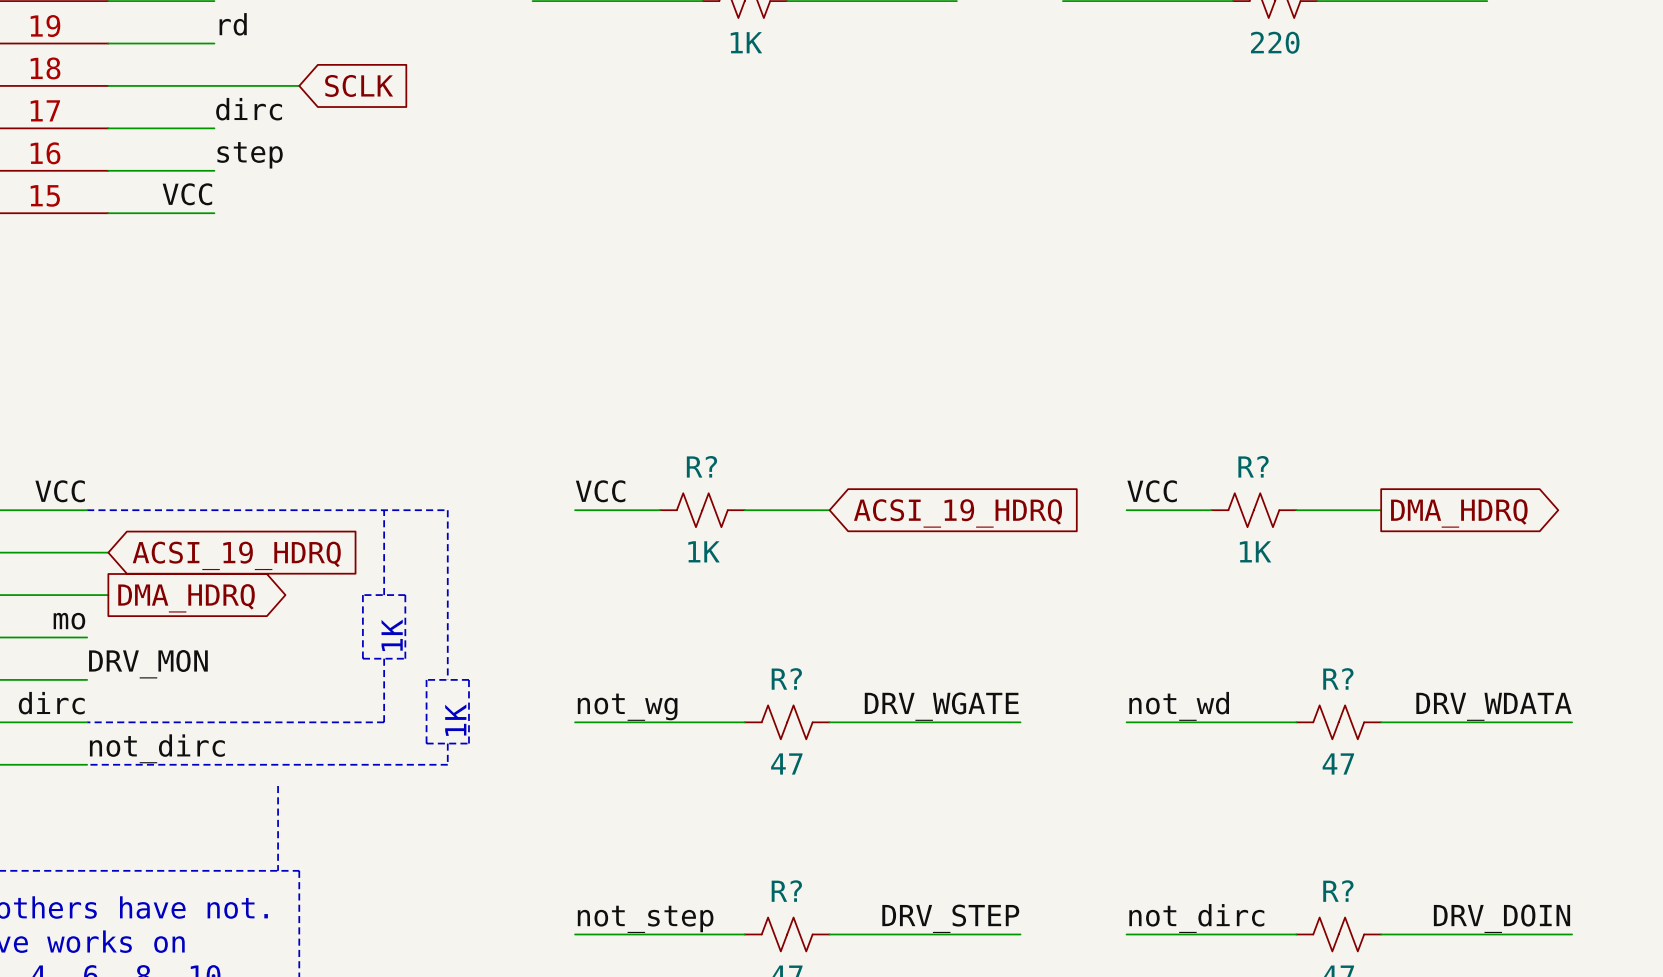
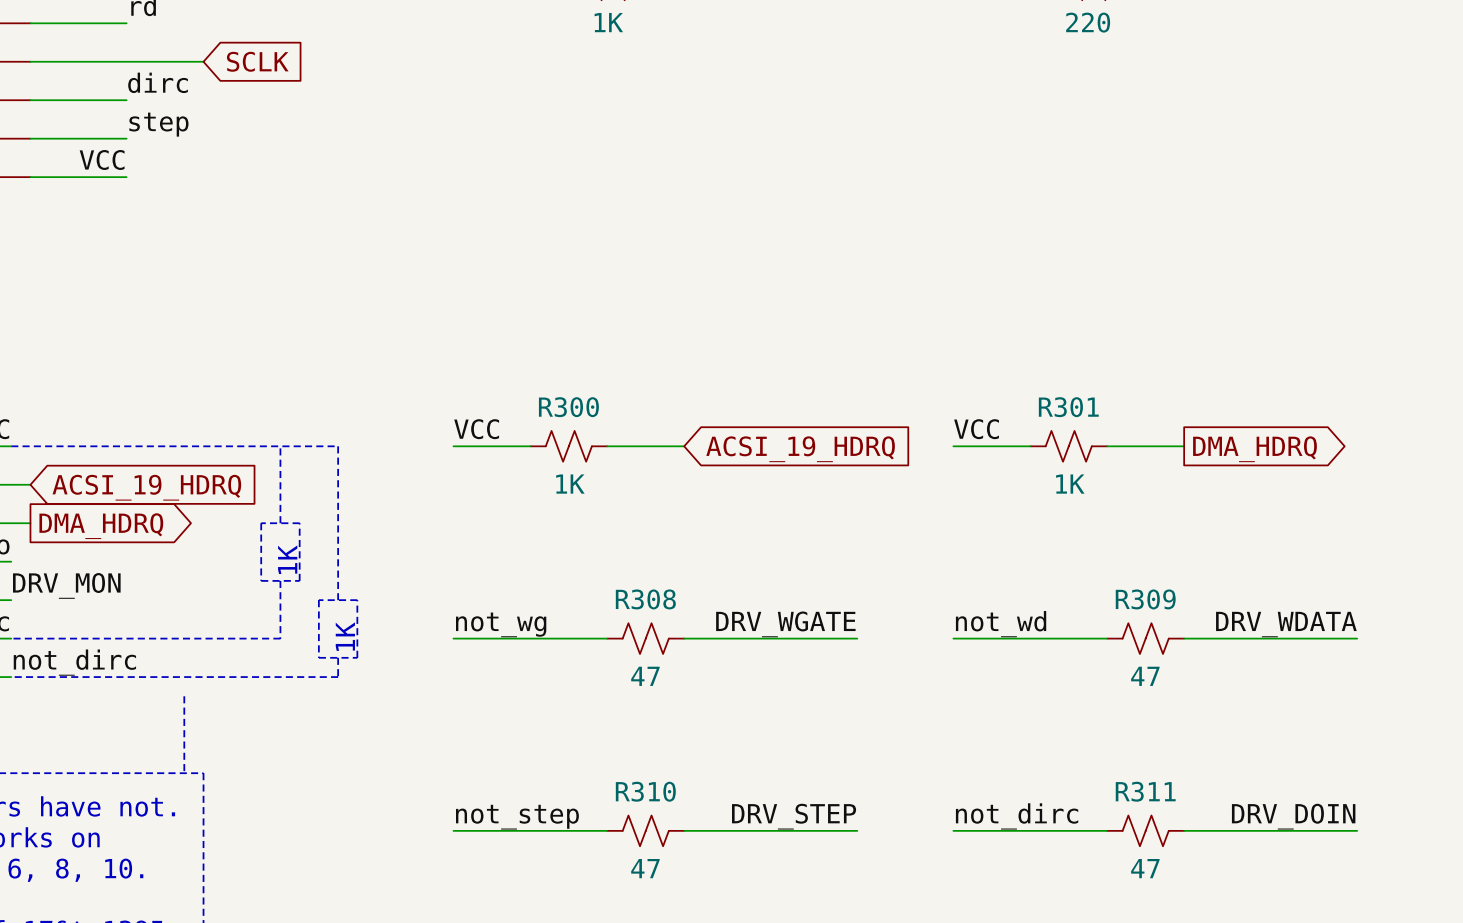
R? name: R? (701, 466) -> R300 (568, 407)
R? name: R? (1253, 466) -> R301 (1068, 407)
R? name: R? (786, 678) -> R308 (645, 599)
R? name: R? (1338, 678) -> R309 (1145, 599)
R? name: R? (786, 891) -> R310 (645, 791)
R? name: R? (1338, 891) -> R311 (1145, 791)

